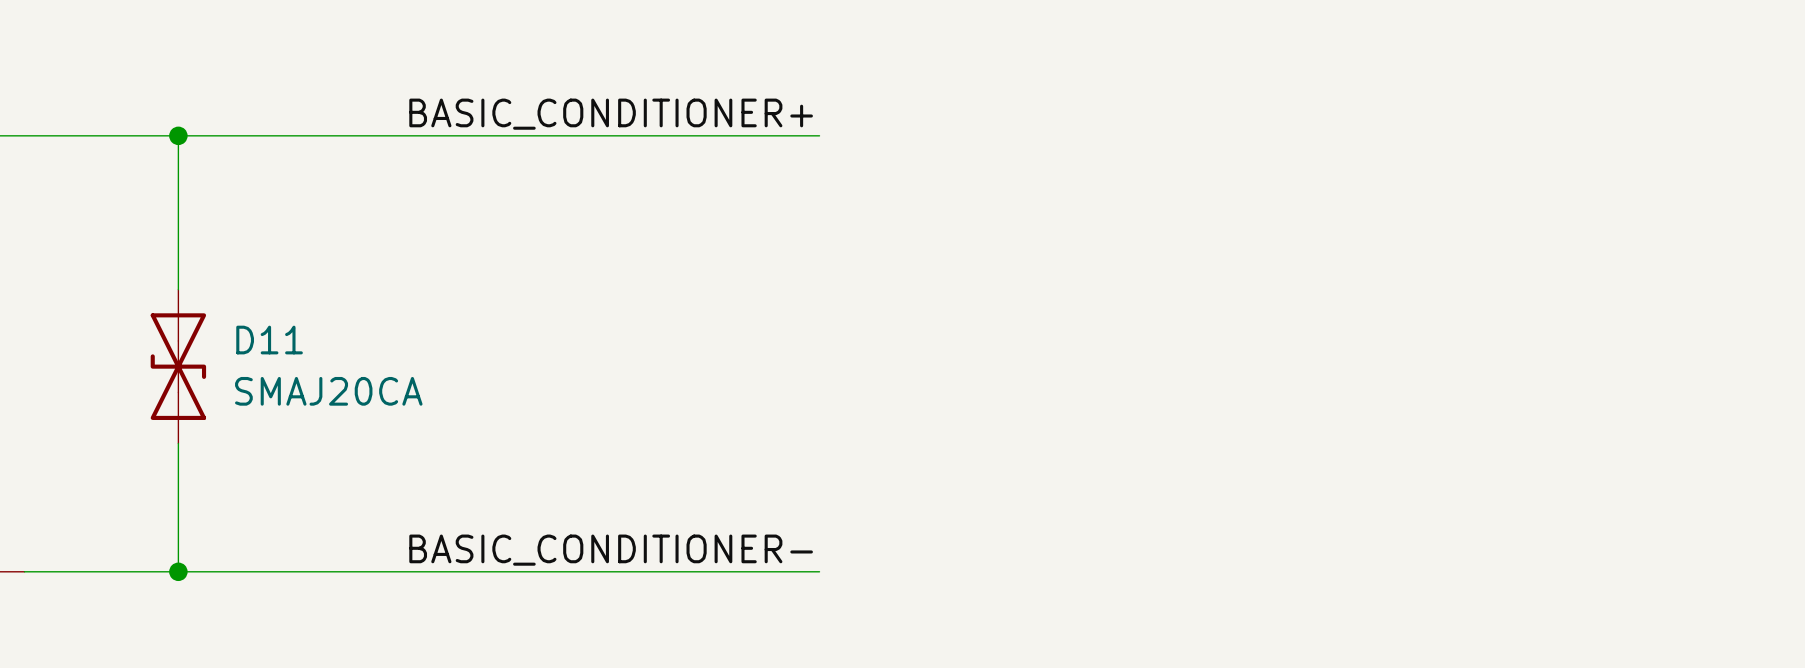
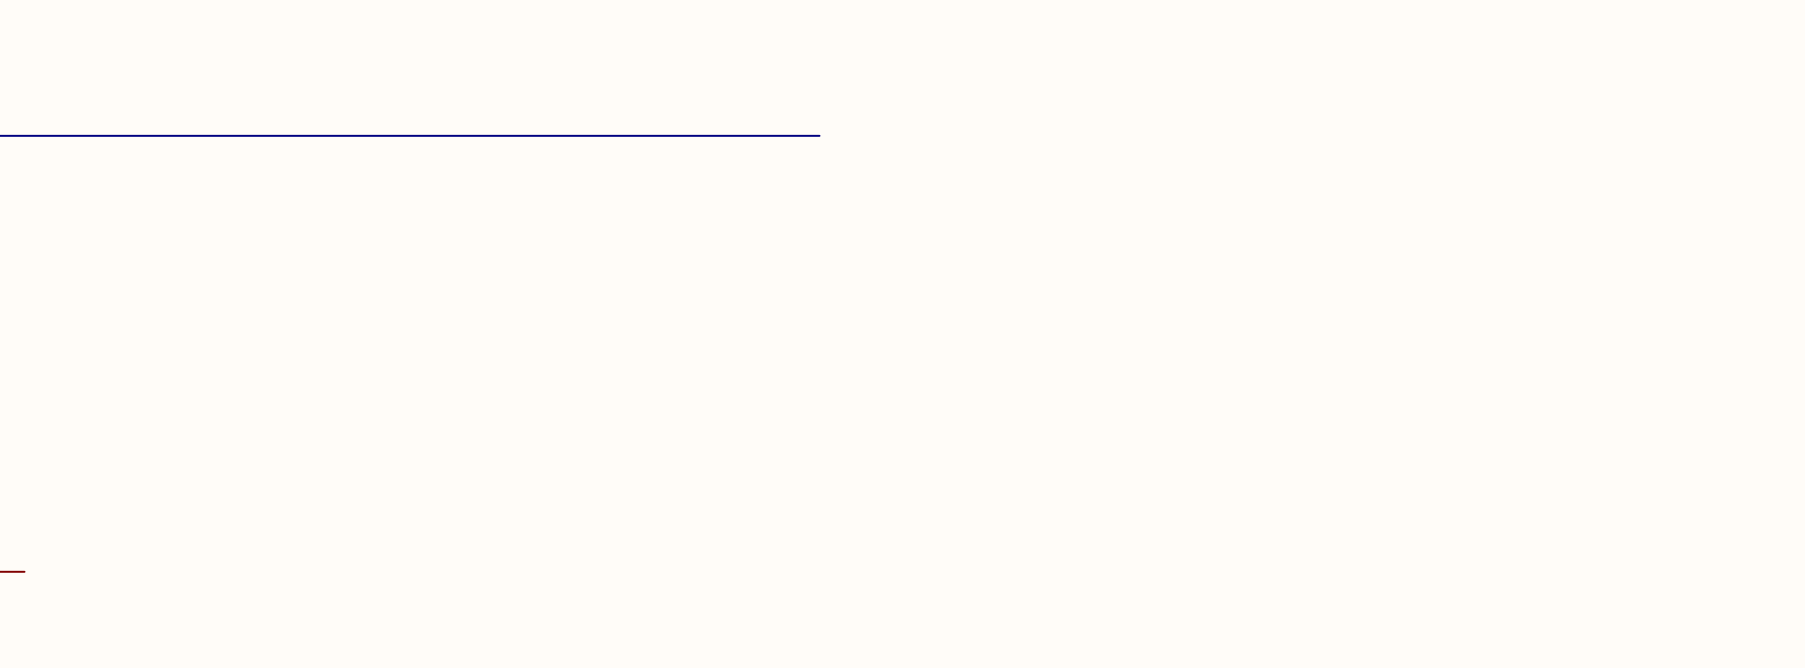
label: BASIC_CONDITIONER+ (611, 114) -> none
wire: (178, 135) (178, 289) -> none
junction: (178, 135) -> none
D11: SMAJ20CA (178, 366) -> none
wire: (178, 443) (178, 571) -> none
label: BASIC_CONDITIONER- (611, 550) -> none
wire: (24, 571) (819, 571) -> none
junction: (178, 571) -> none

